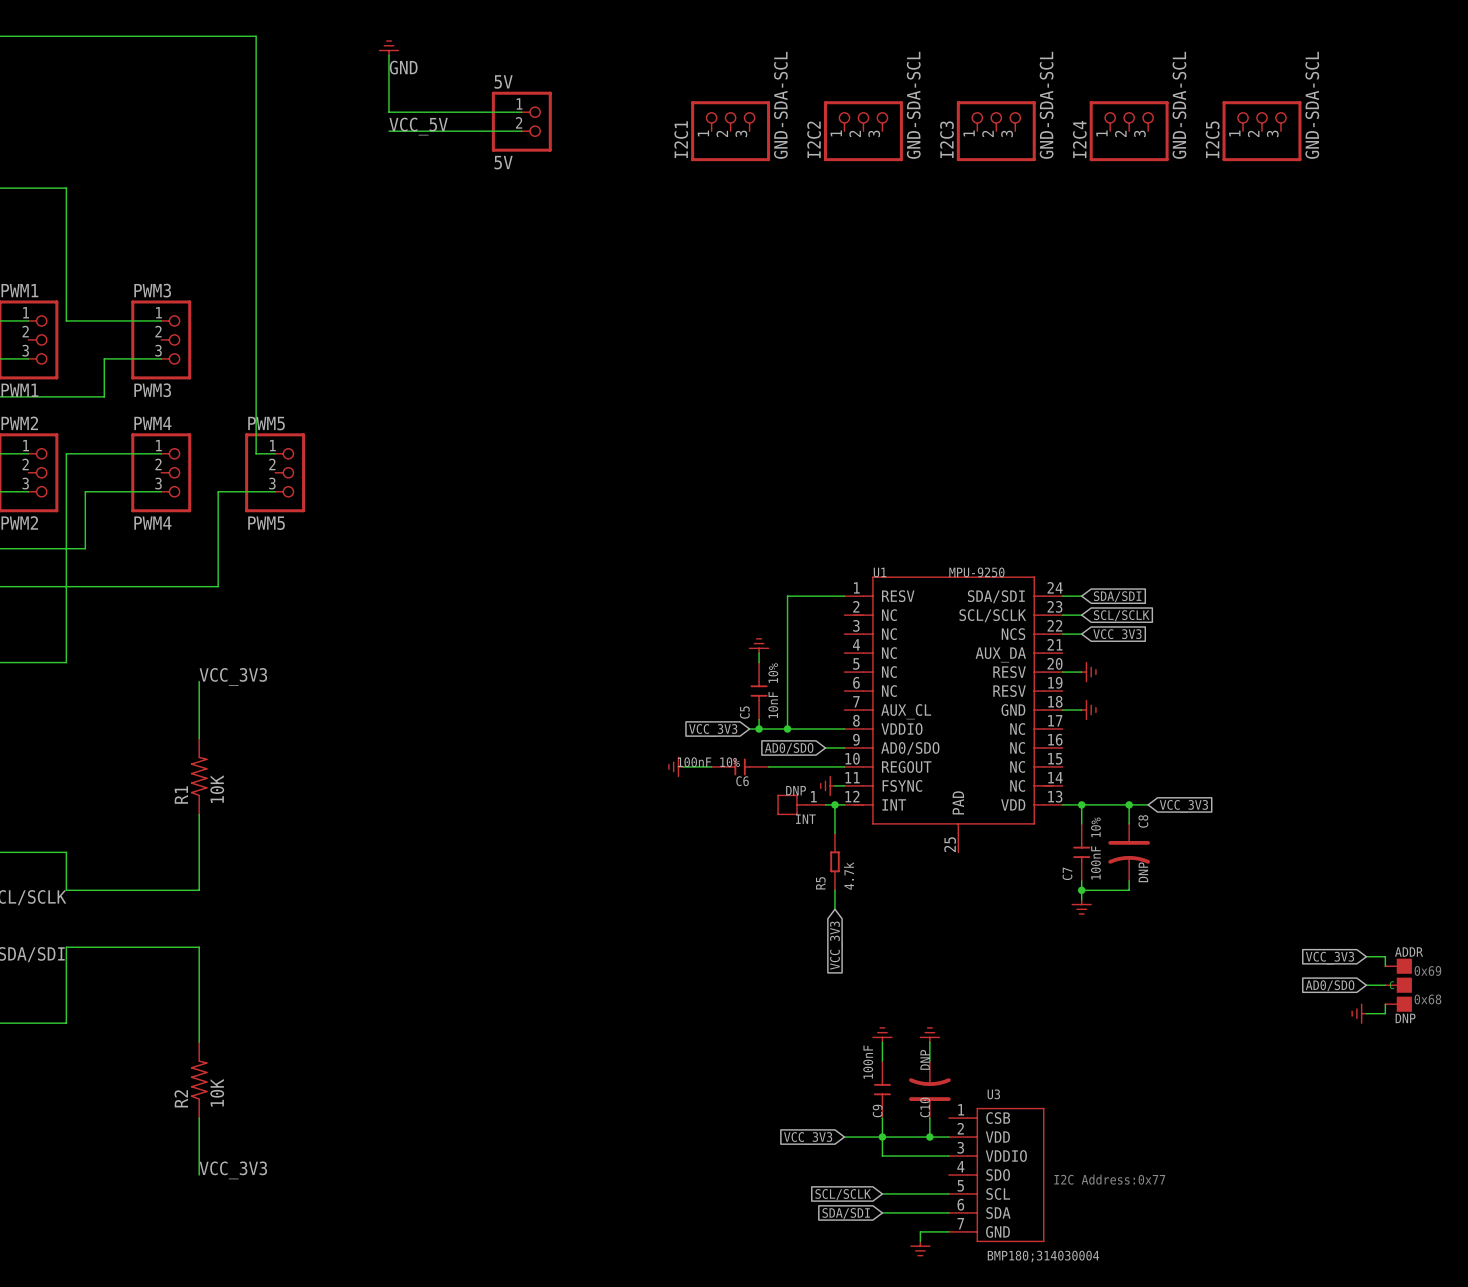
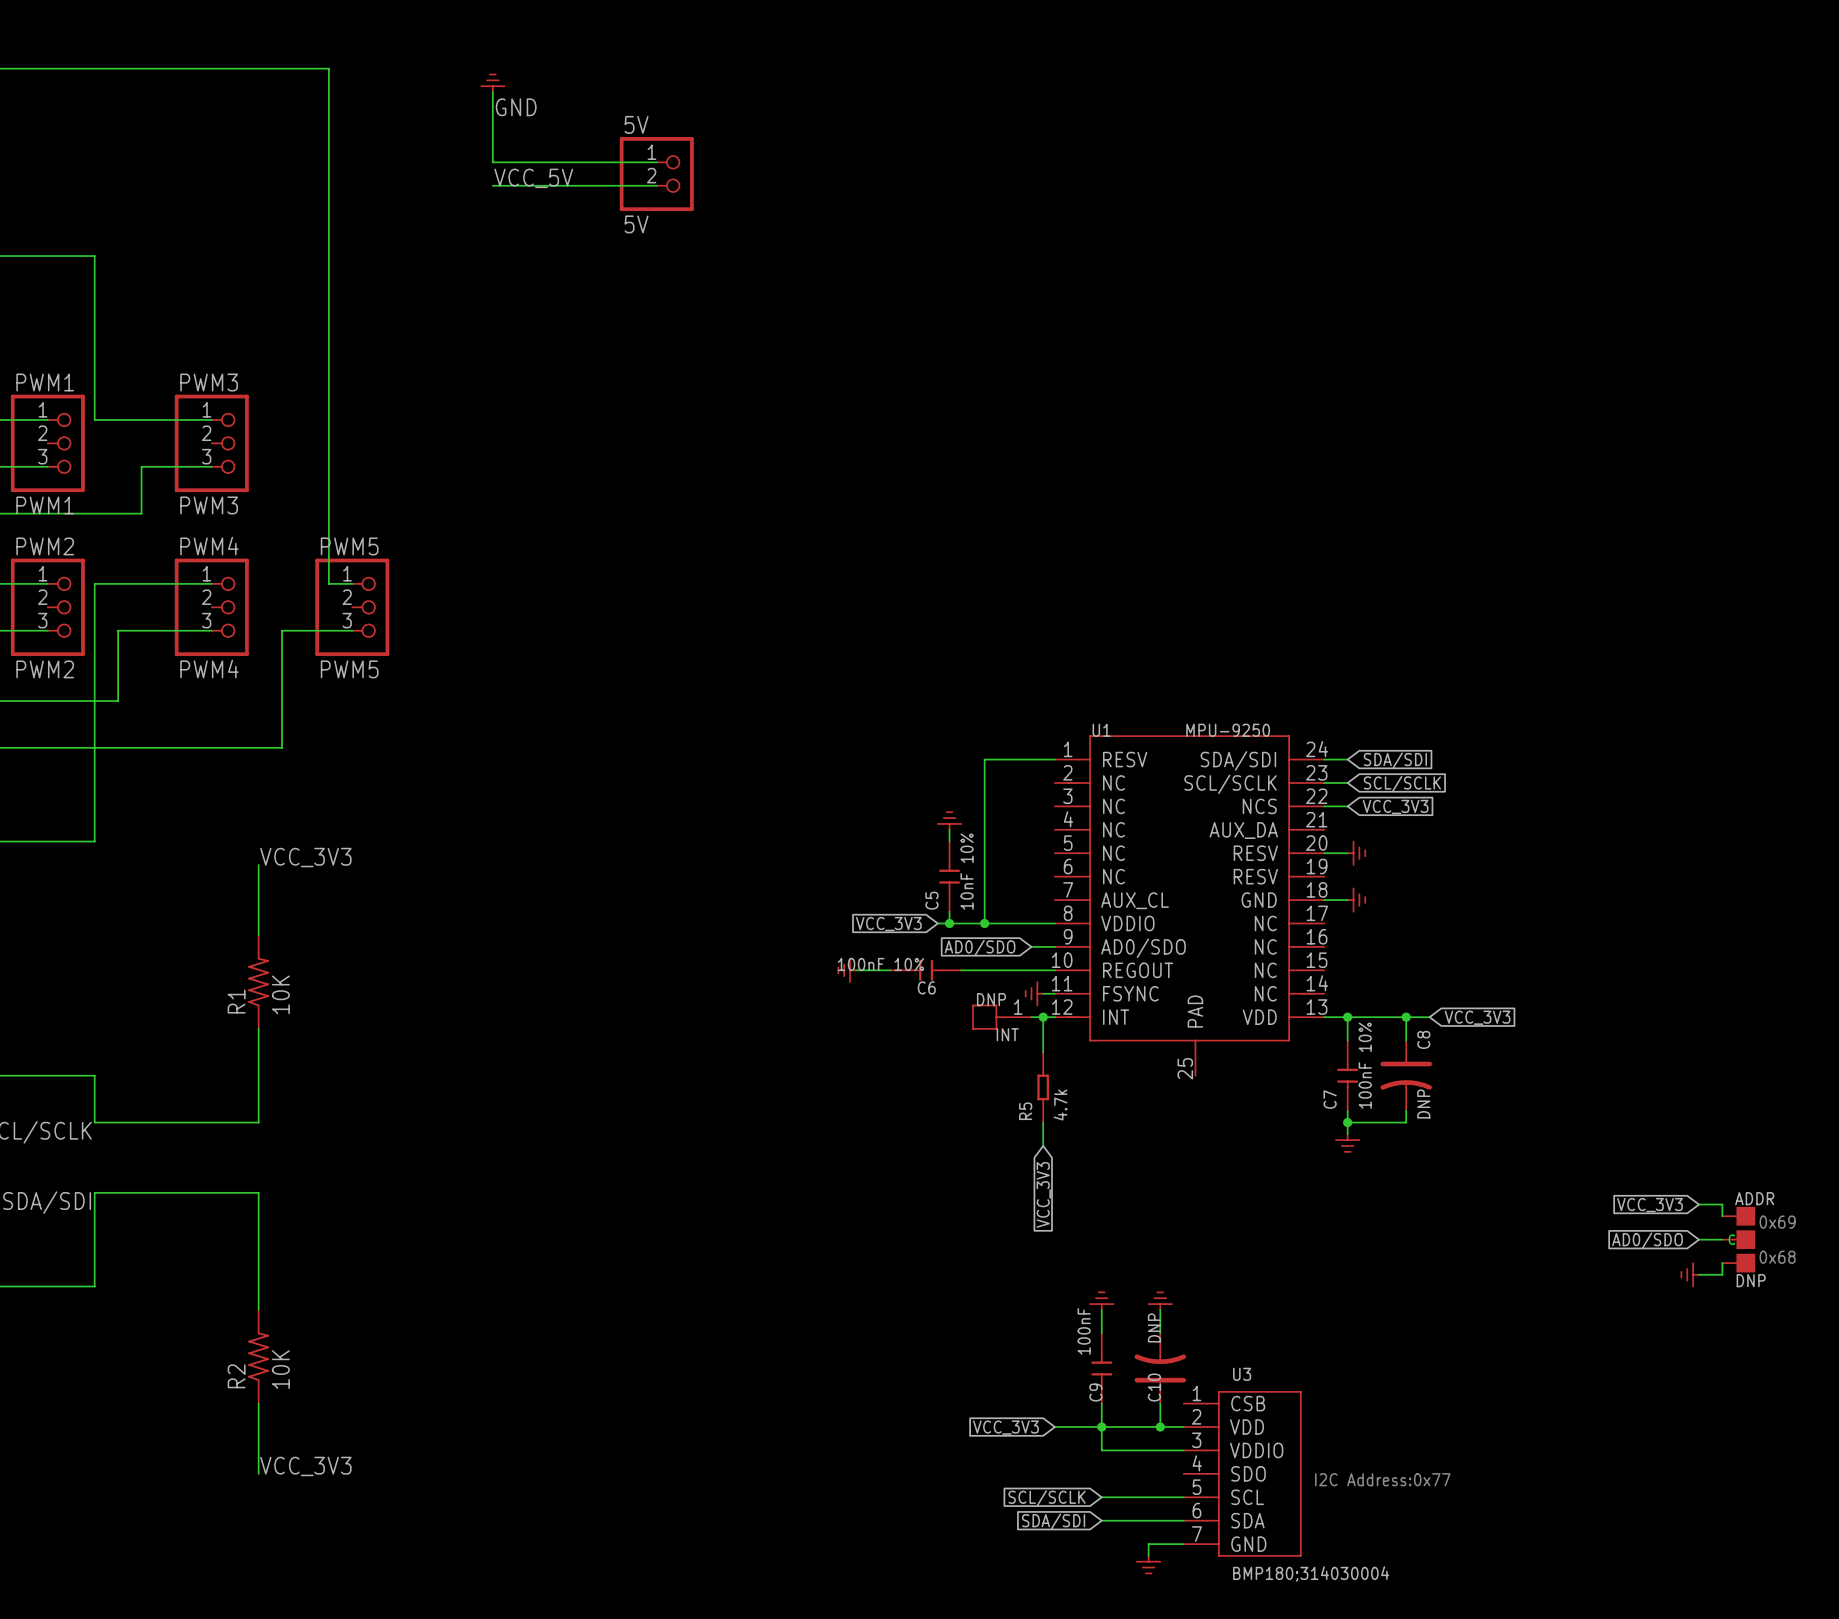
I2C1: GND-SDA-SCL (730, 131) -> none
I2C2: GND-SDA-SCL (863, 131) -> none
I2C3: GND-SDA-SCL (996, 131) -> none
I2C4: GND-SDA-SCL (1129, 131) -> none
I2C5: GND-SDA-SCL (1261, 131) -> none

